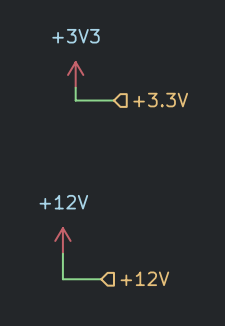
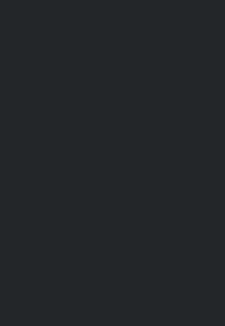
power symbol: +3V3 (75, 74) -> none
wire: (75, 87) (75, 100) (113, 100) -> none
hierarchical label: +3.3V (160, 100) -> none
power symbol: +12V (62, 240) -> none
wire: (62, 253) (62, 279) (101, 279) -> none
hierarchical label: +12V (144, 278) -> none

